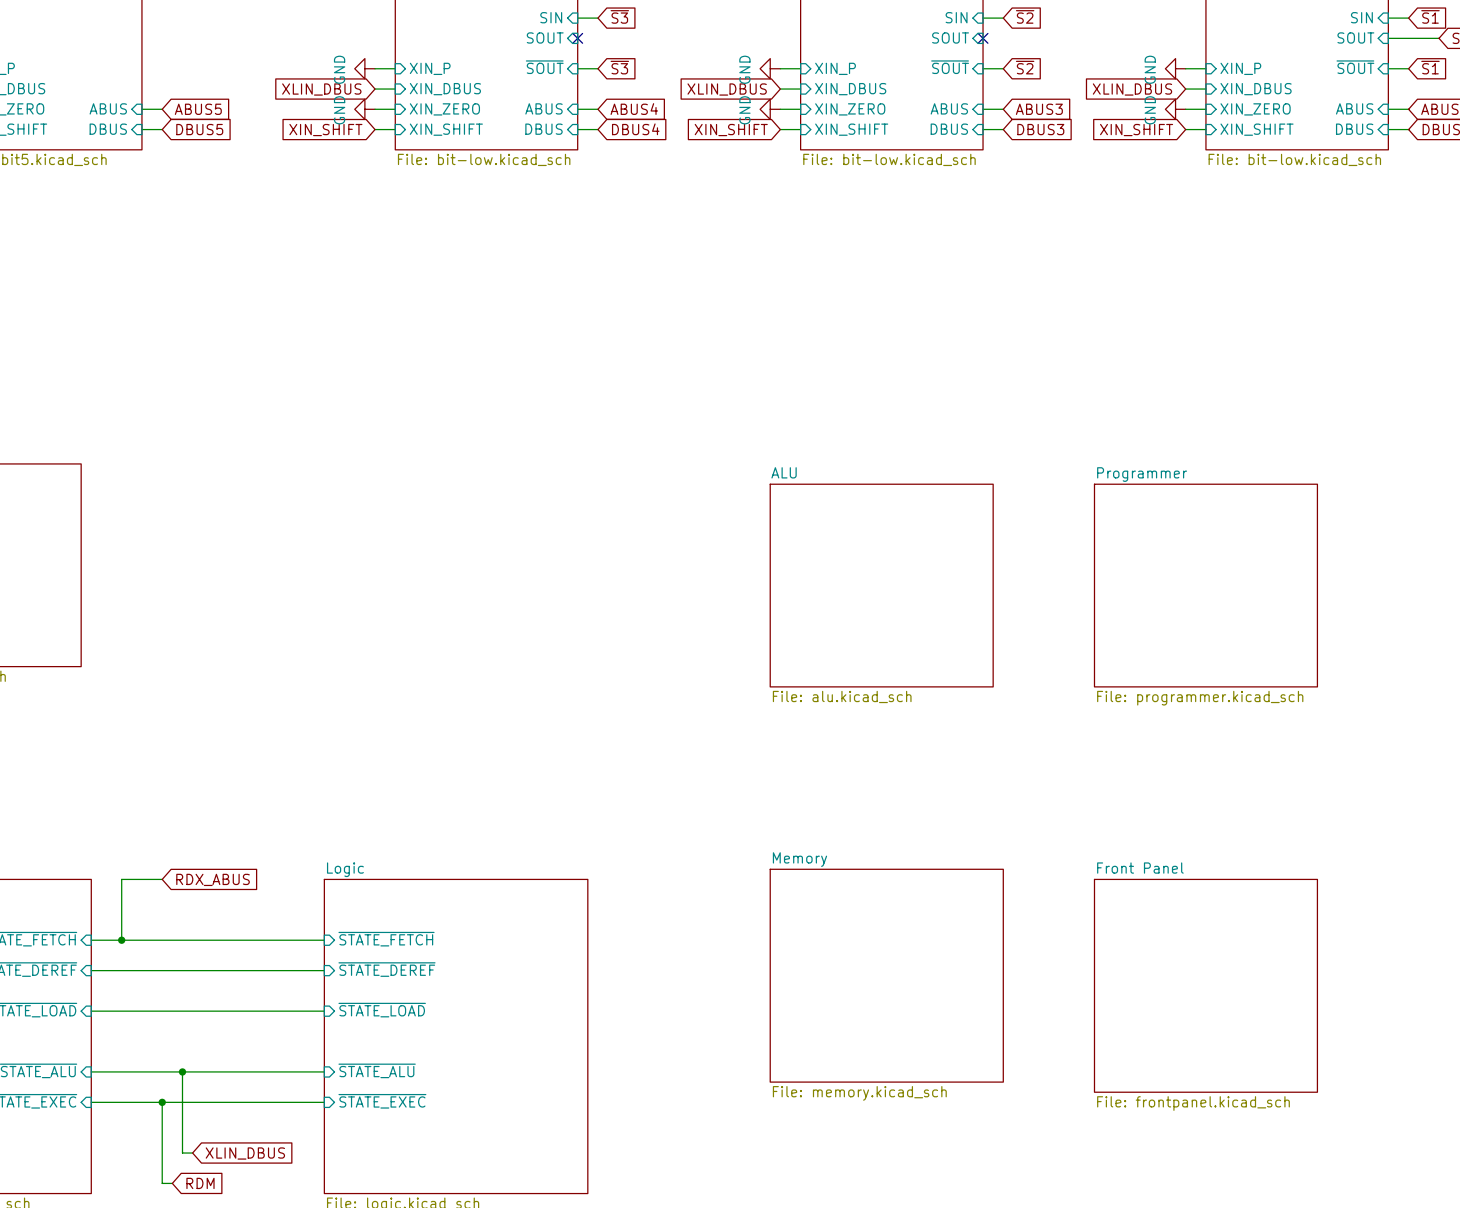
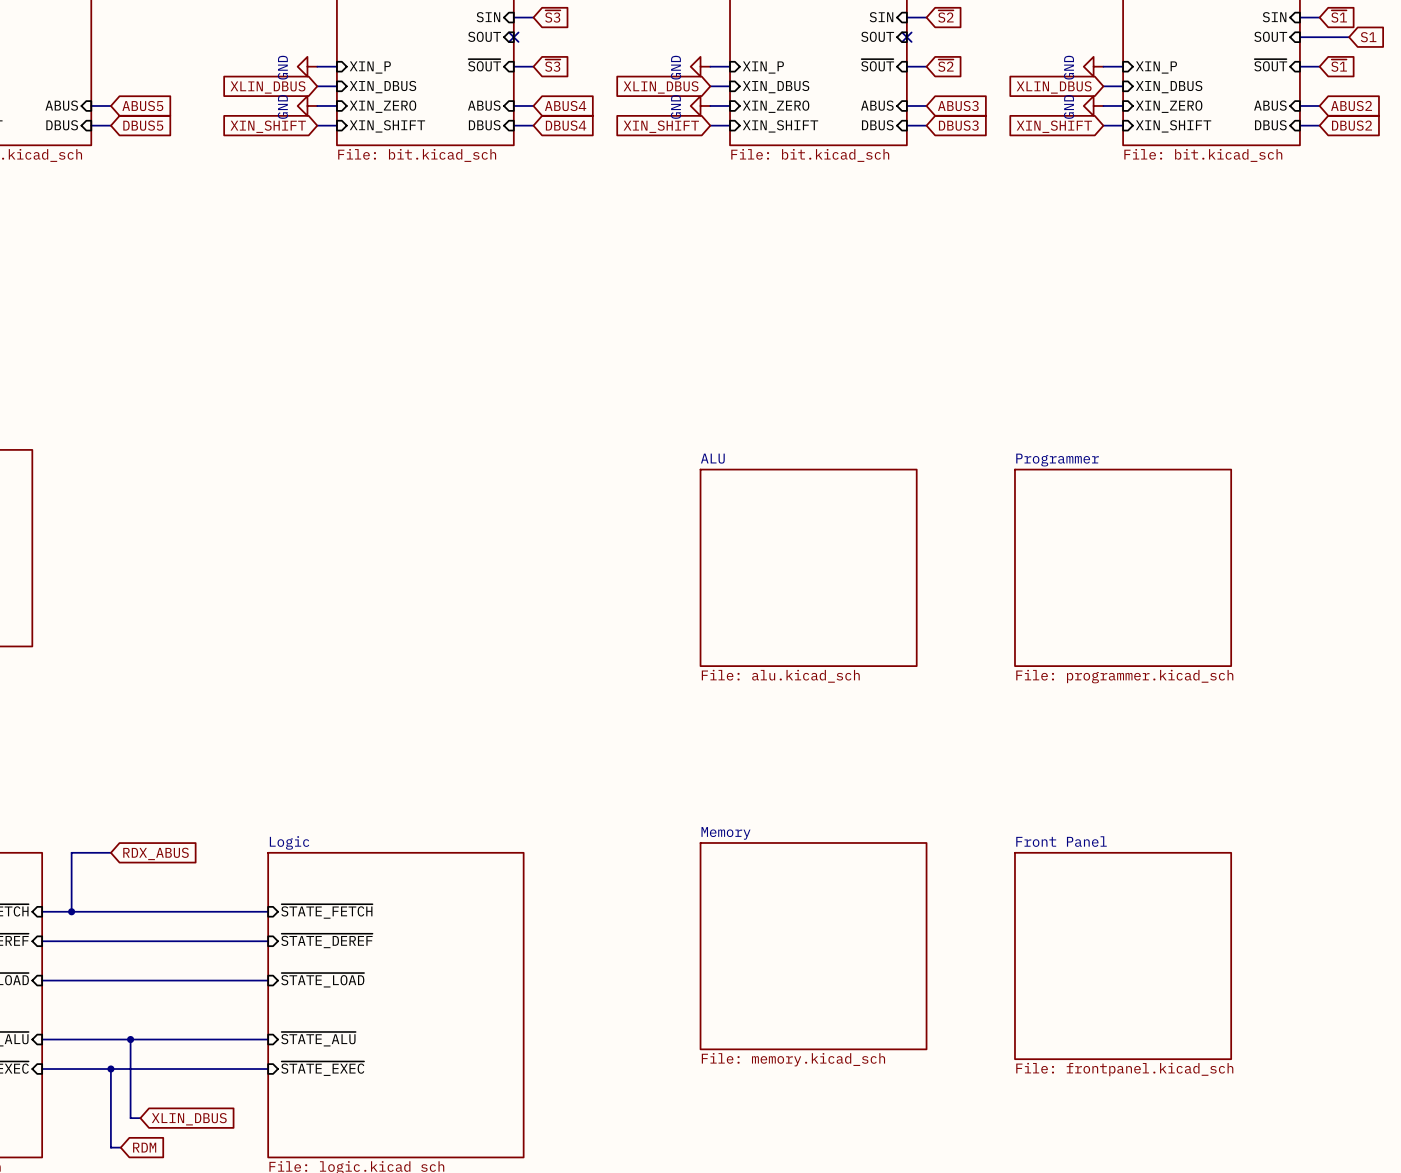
sheet value: File: bit-low.kicad_sch (484, 159) -> File: bit.kicad_sch (417, 155)
sheet value: File: bit-low.kicad_sch (889, 159) -> File: bit.kicad_sch (810, 155)
sheet value: File: bit-low.kicad_sch (1294, 159) -> File: bit.kicad_sch (1203, 155)

